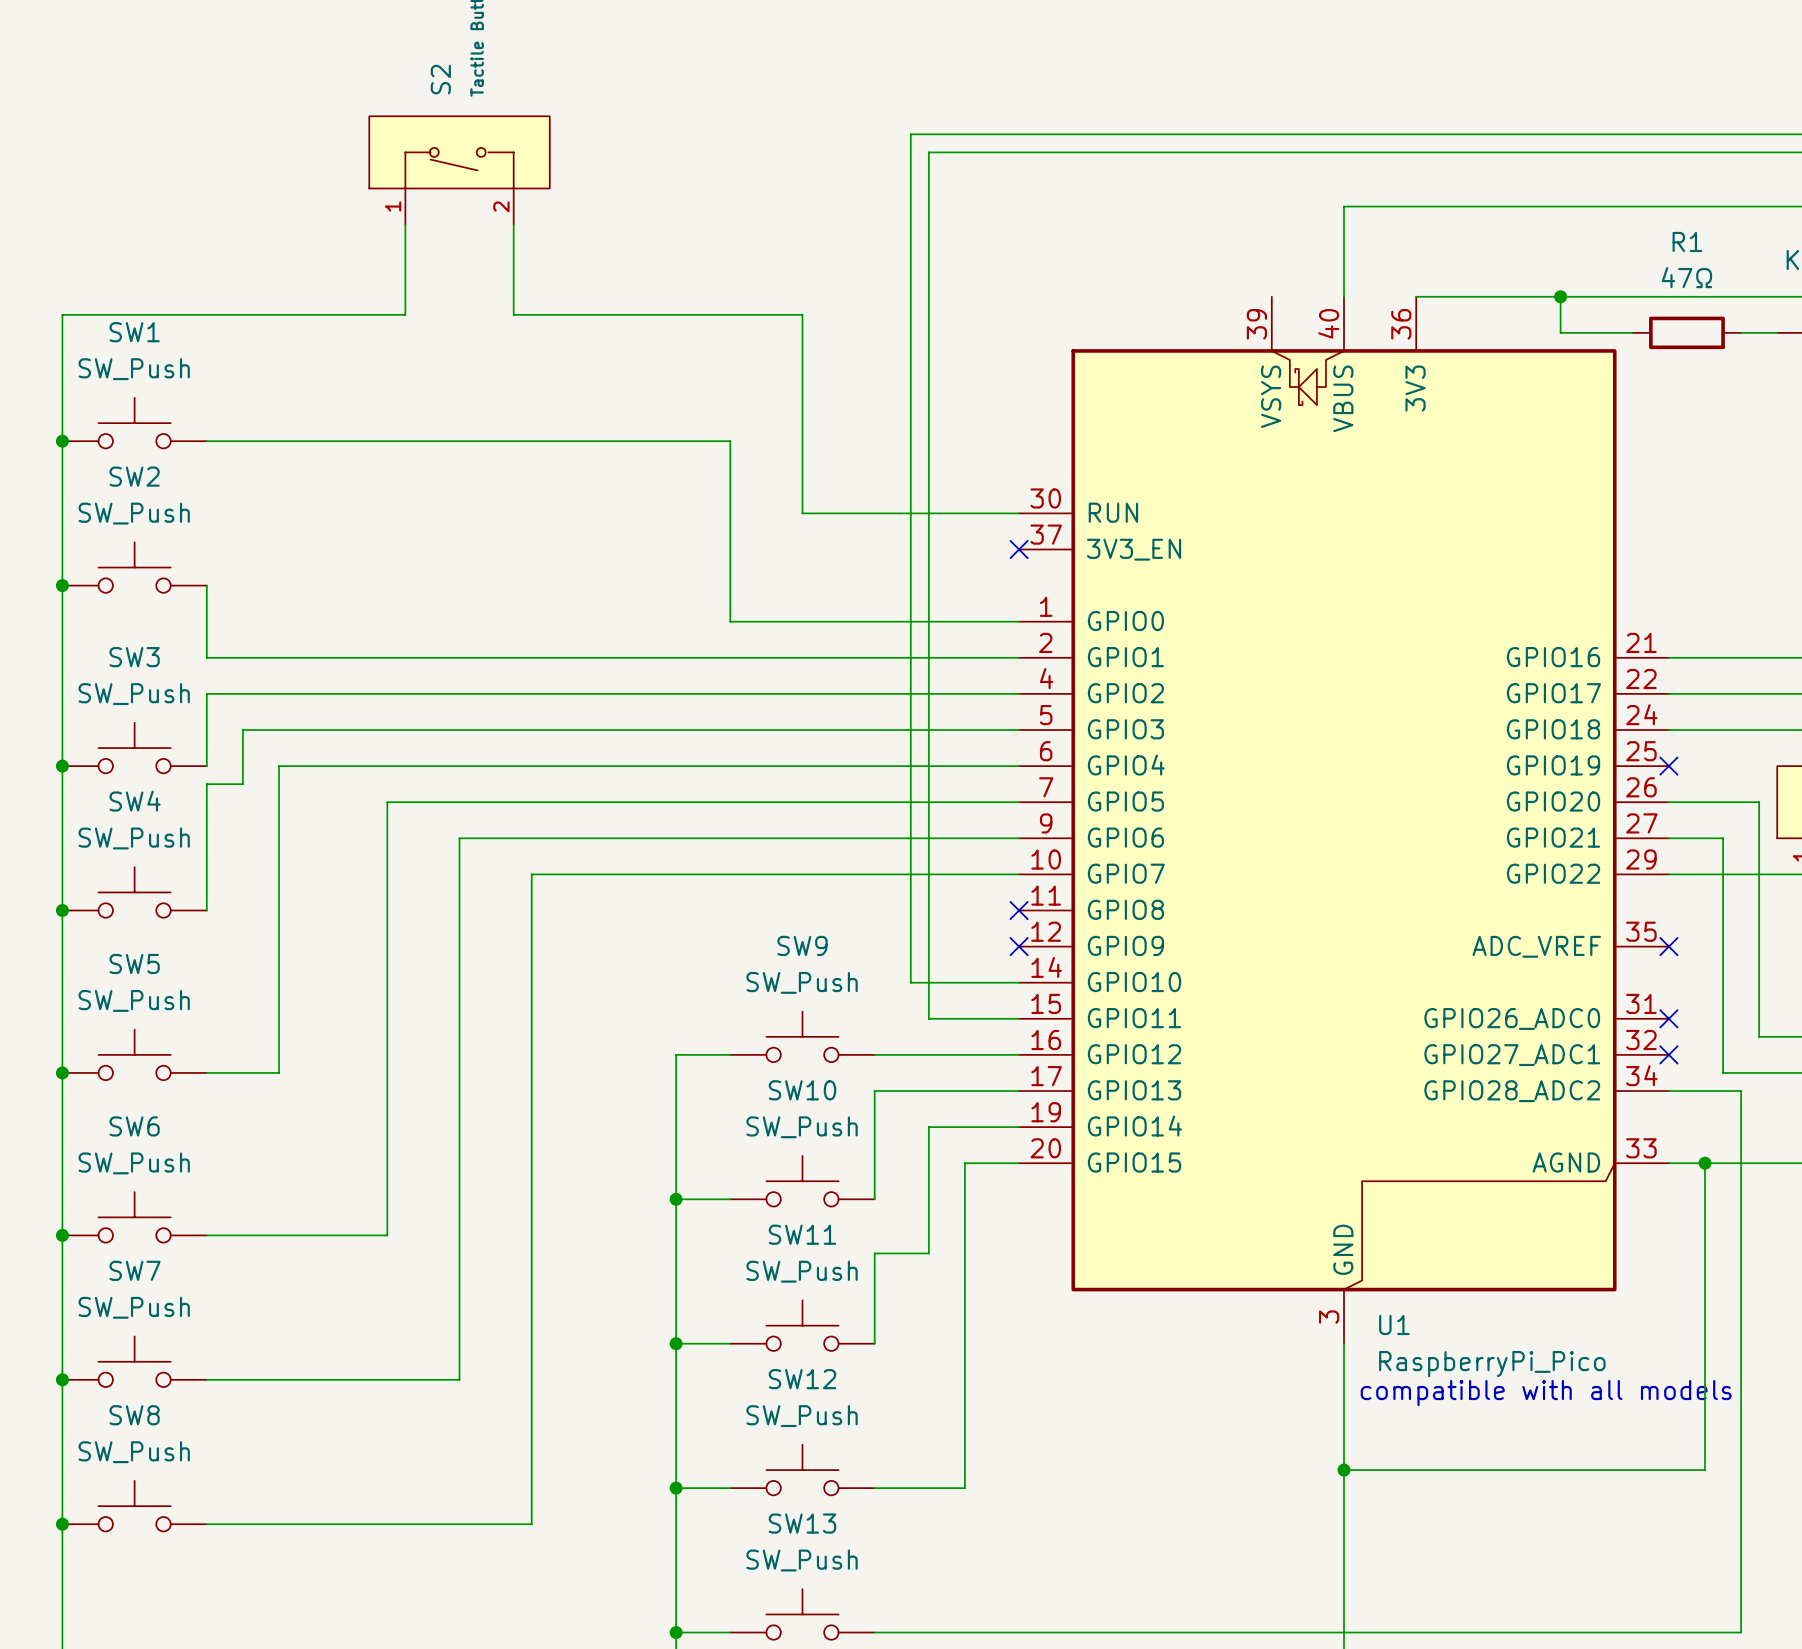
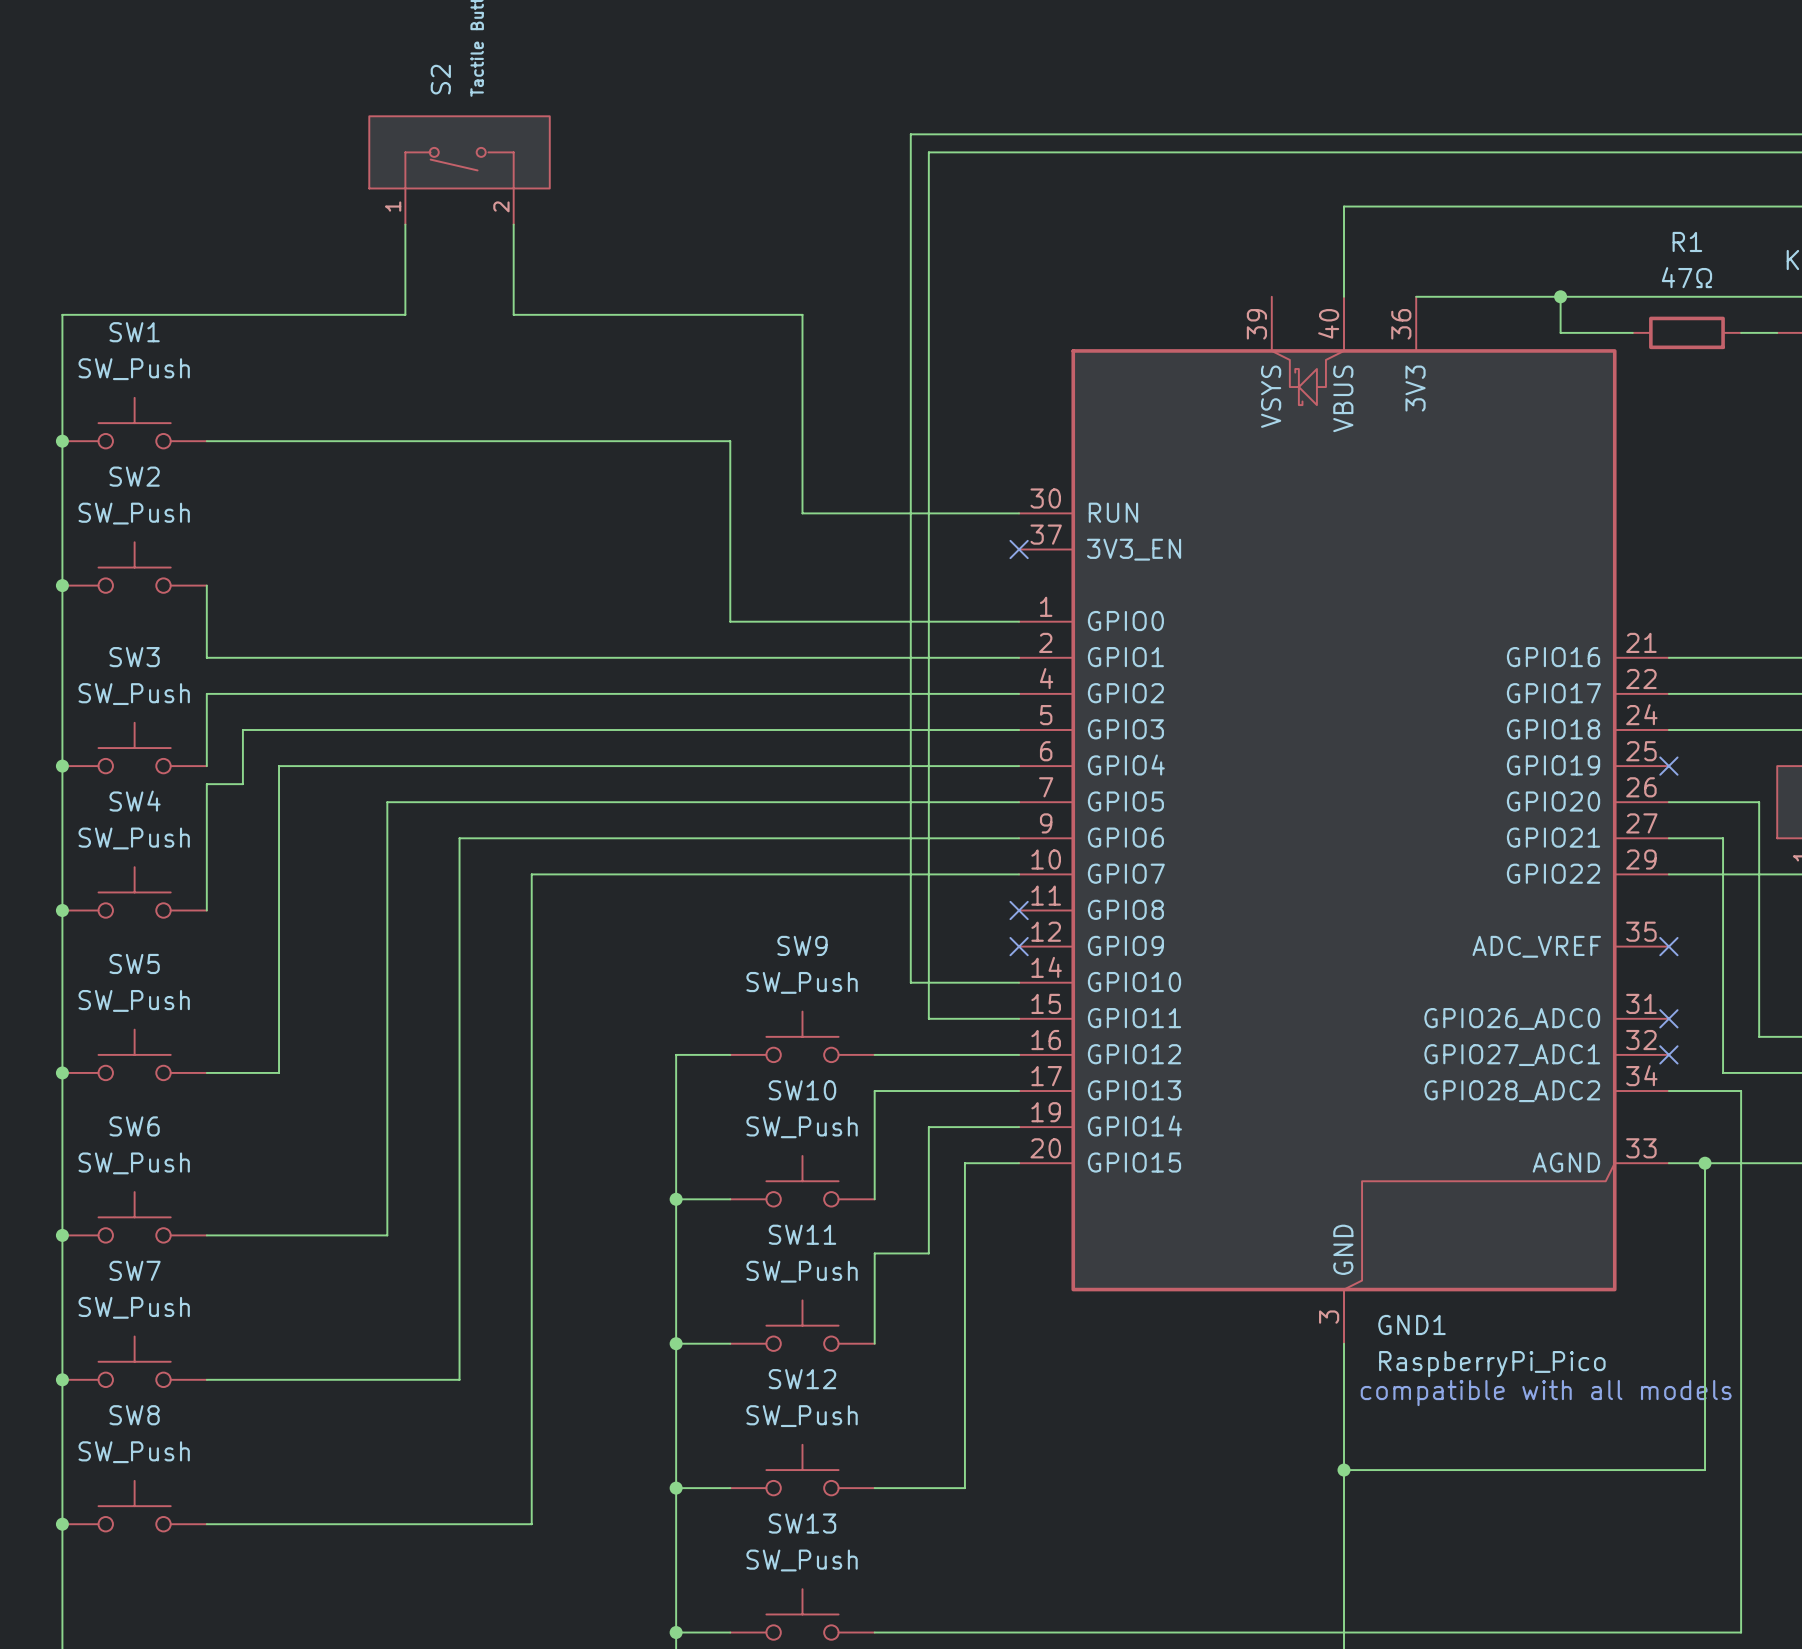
U1 name: U1 (1394, 1324) -> GND1 (1411, 1324)

